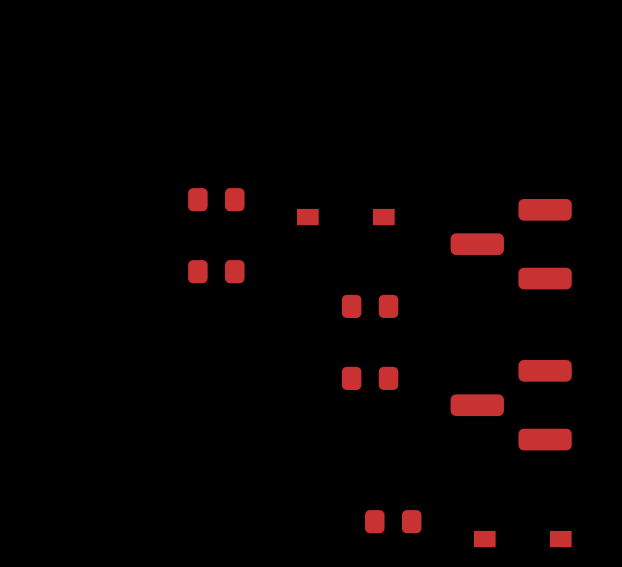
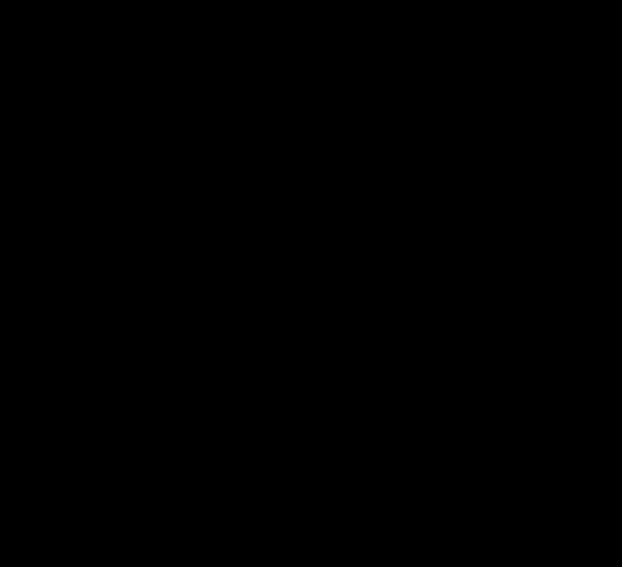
part: (216, 199) -> none
part: (345, 217) -> none
part: (511, 244) -> none
part: (216, 271) -> none
part: (370, 306) -> none
part: (370, 378) -> none
part: (511, 405) -> none
part: (393, 521) -> none
part: (522, 539) -> none

